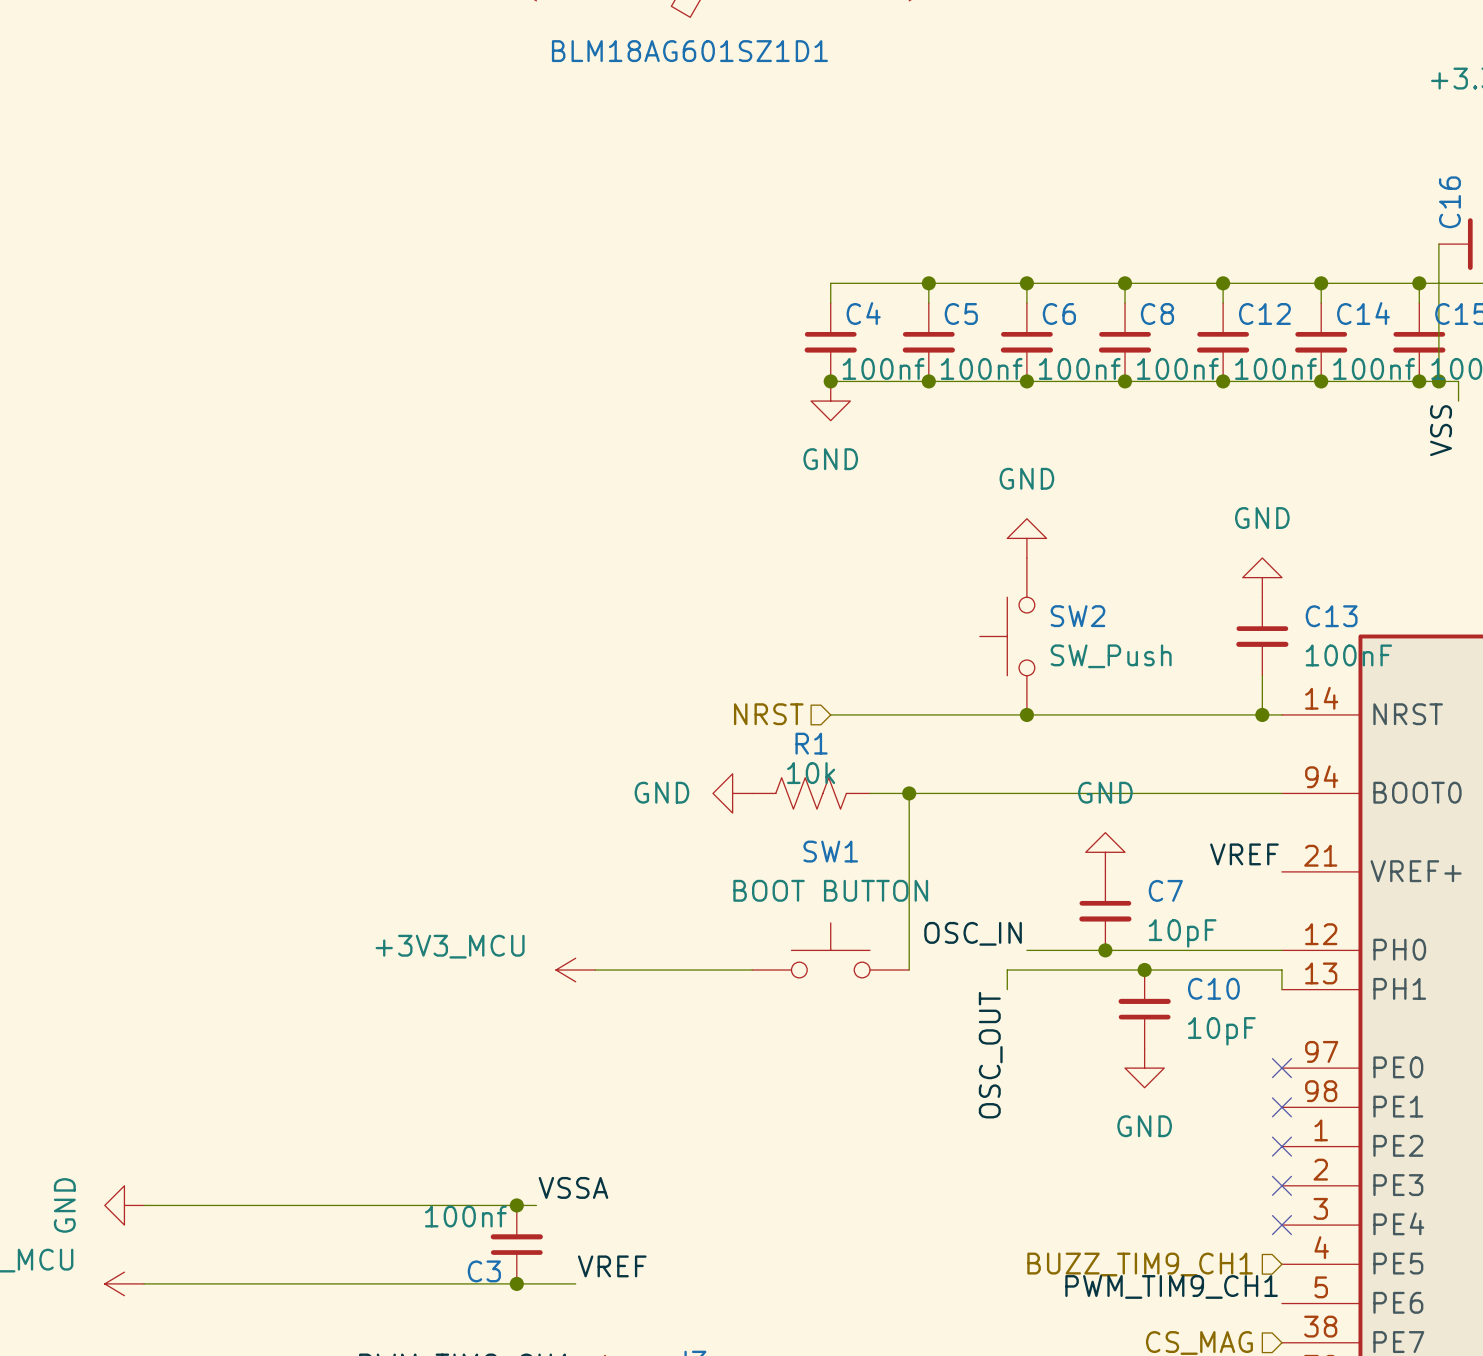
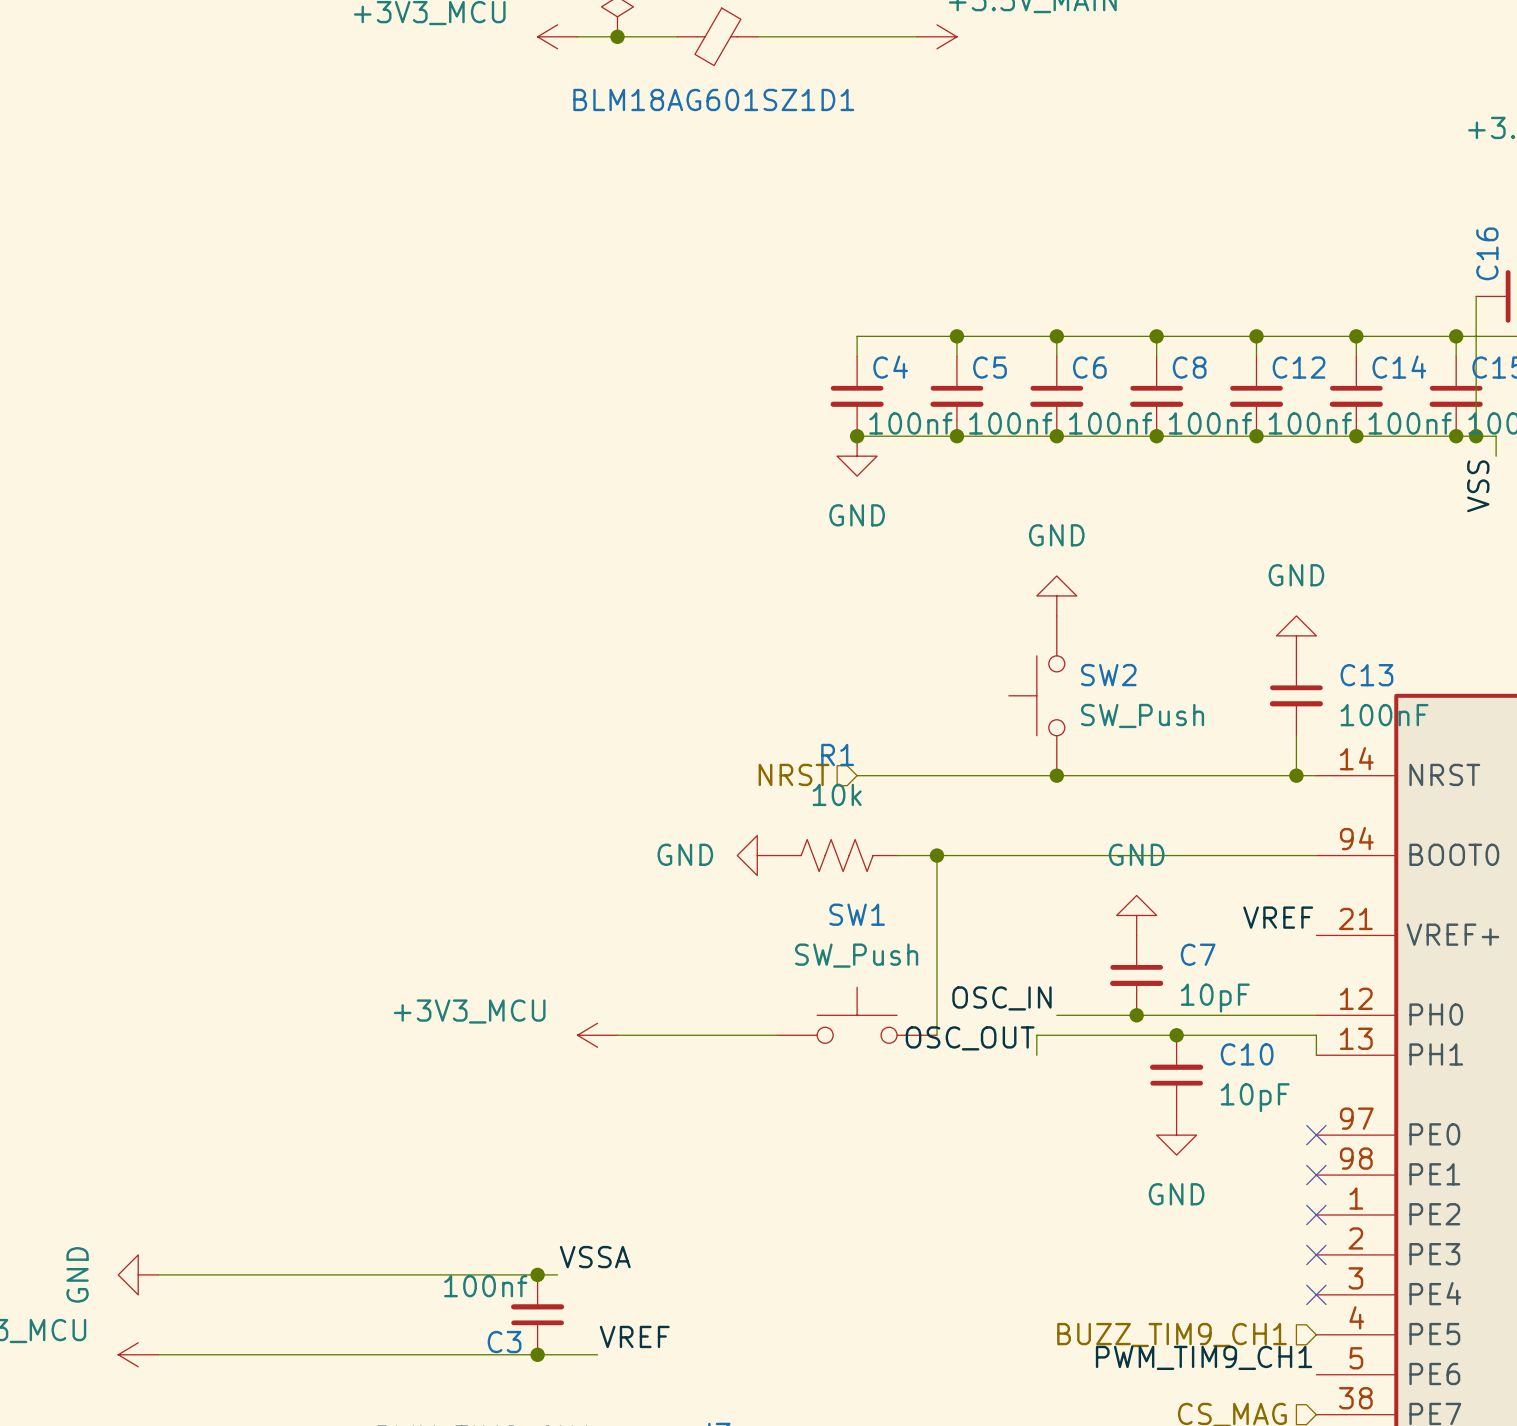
R1 name position: R1 (811, 743) -> R1 (837, 754)
R1 value position: 10k (811, 773) -> 10k (837, 794)
SW1 value: BOOT BUTTON (830, 890) -> SW_Push (856, 955)
label rotation: 0° (990, 1055) -> 90° clockwise (970, 1038)

